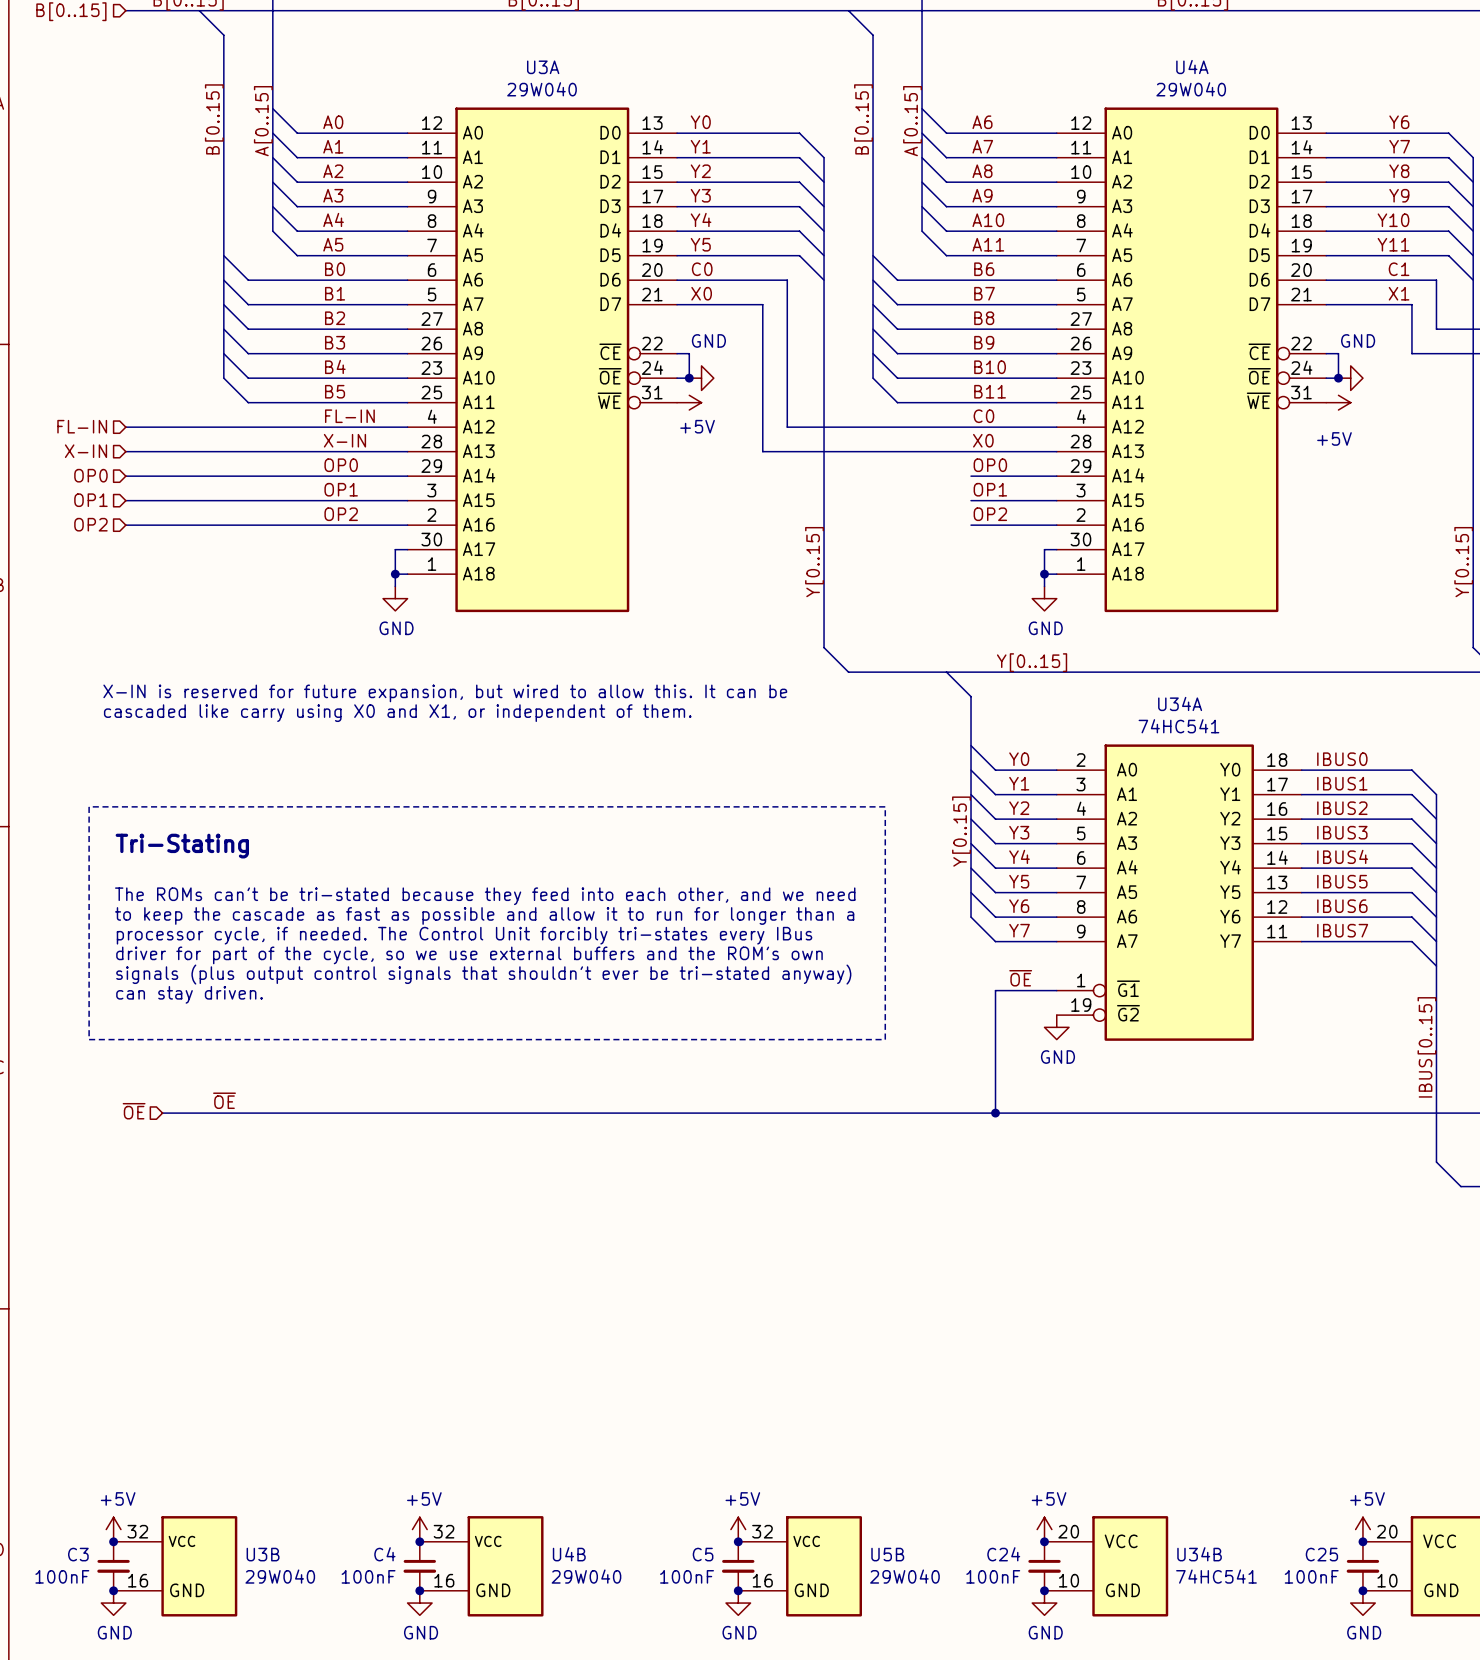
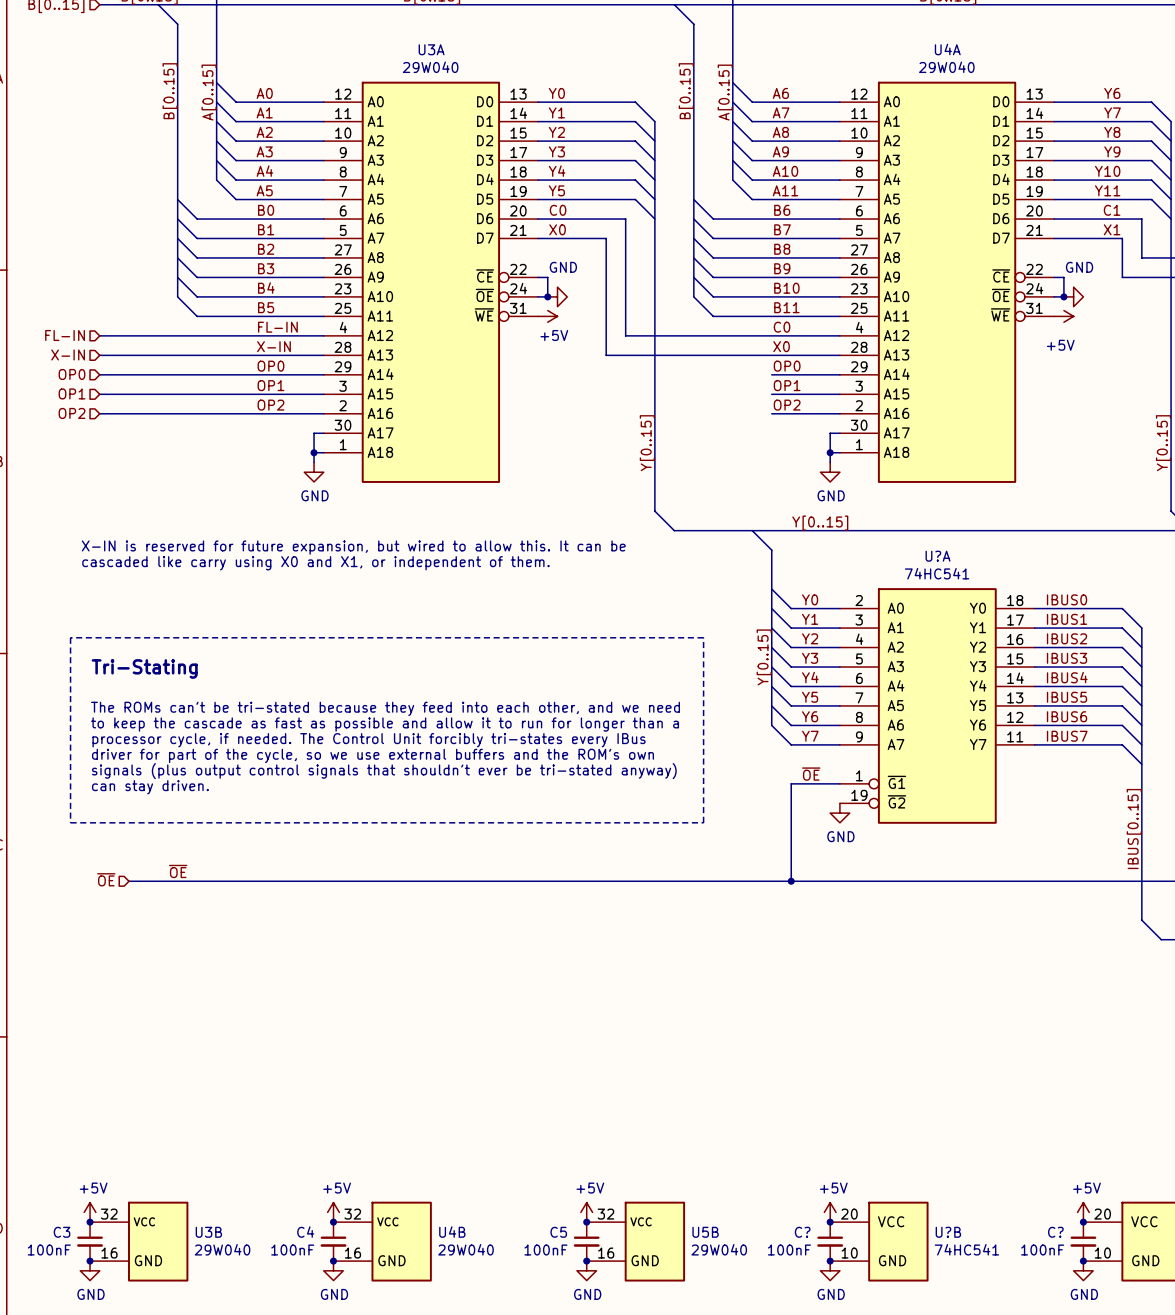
U34A name: U34A (1180, 703) -> U?A (938, 556)
C24 name: C24 (1003, 1554) -> C? (802, 1232)
U34B name: U34B (1199, 1554) -> U?B (948, 1232)
C25 name: C25 (1321, 1554) -> C? (1055, 1232)

